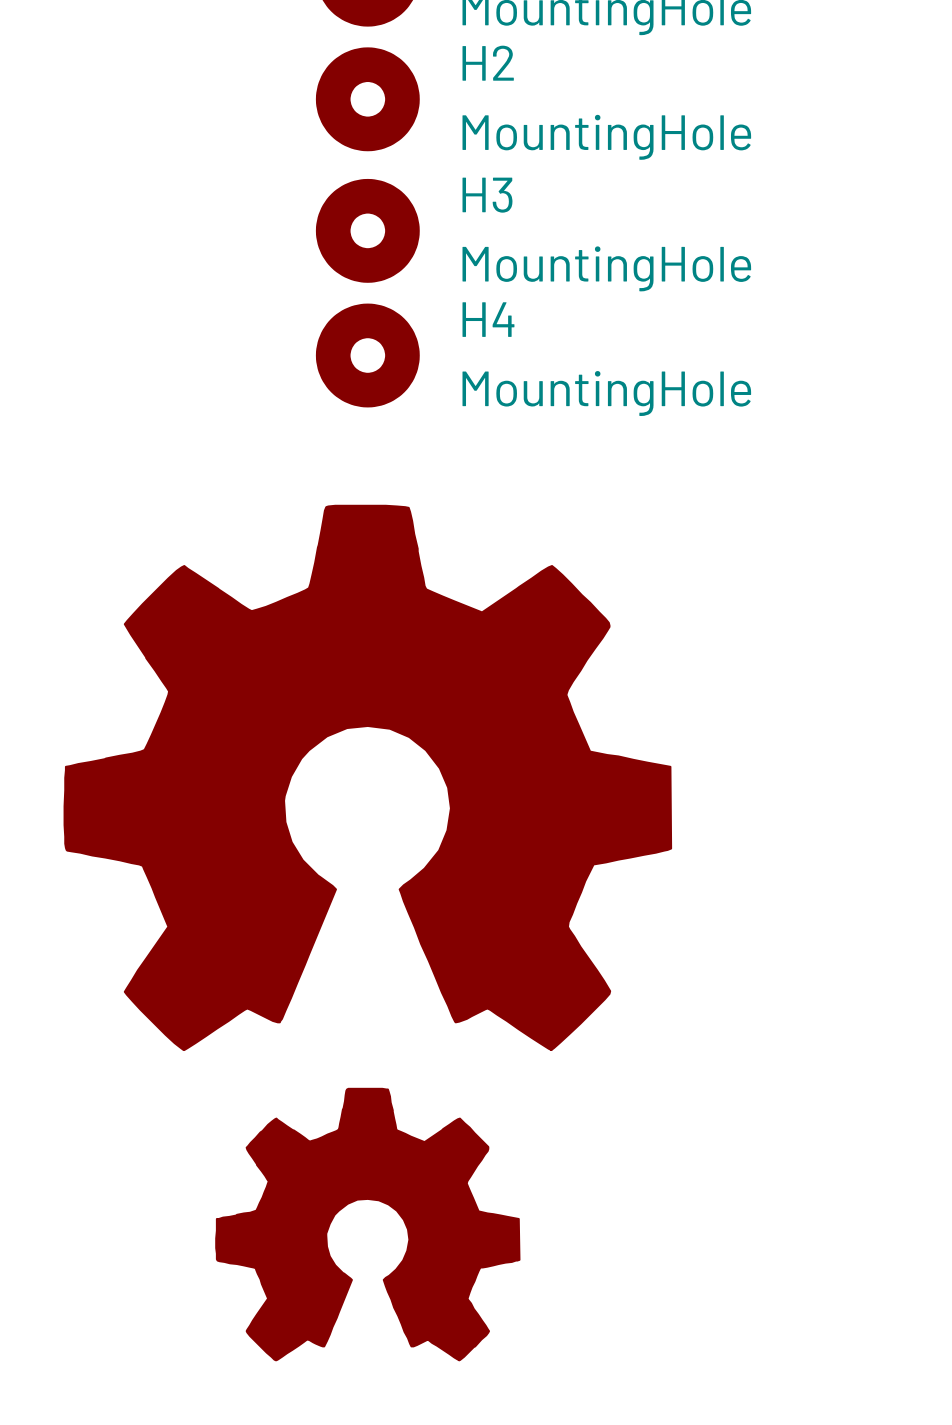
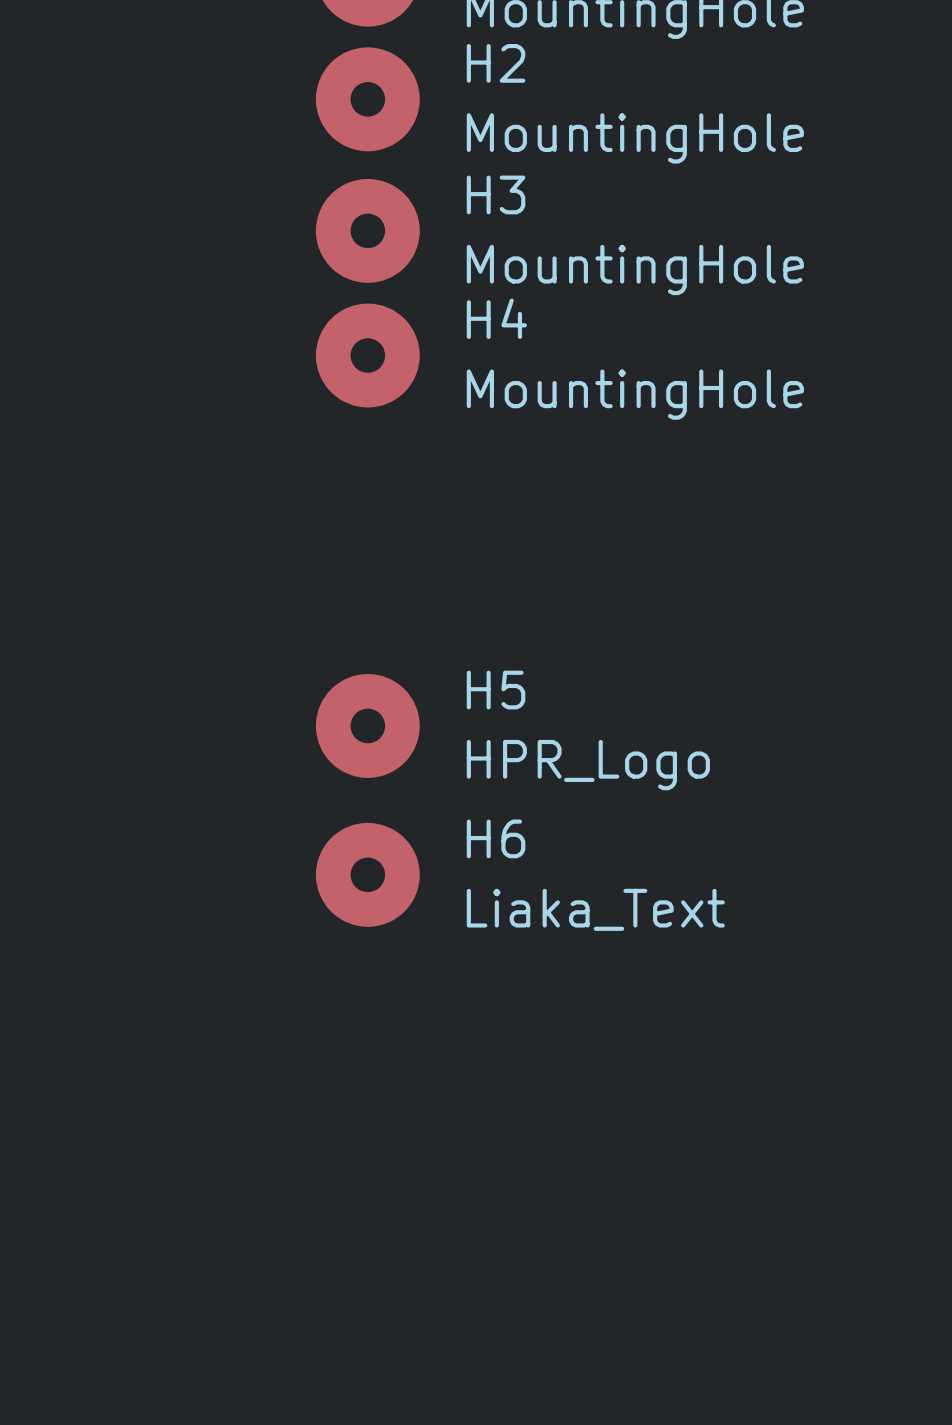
H5: none -> HPR_Logo (367, 725)
power symbol: (367, 777) -> none
H6: none -> Liaka_Text (367, 874)
power symbol: (367, 1224) -> none

